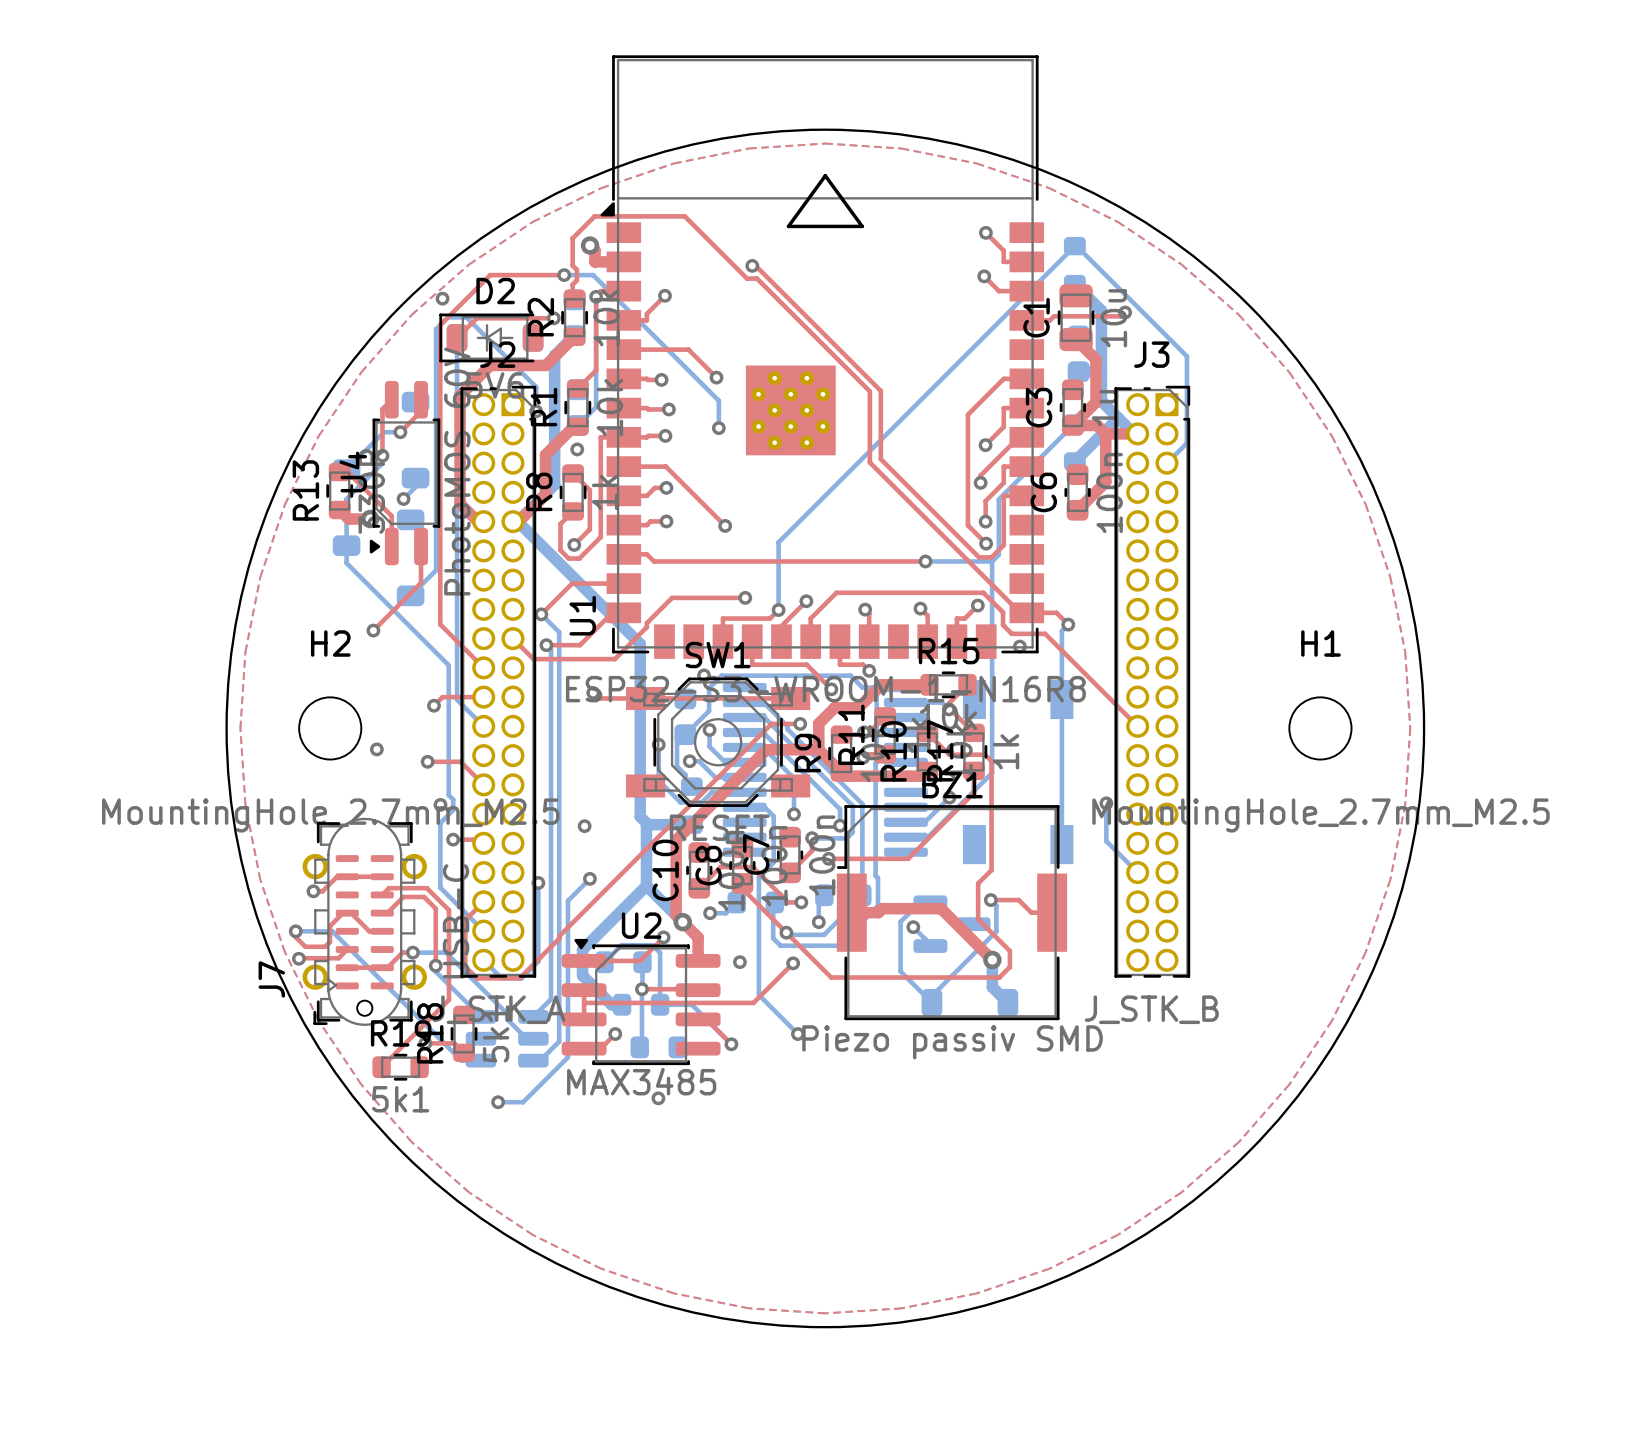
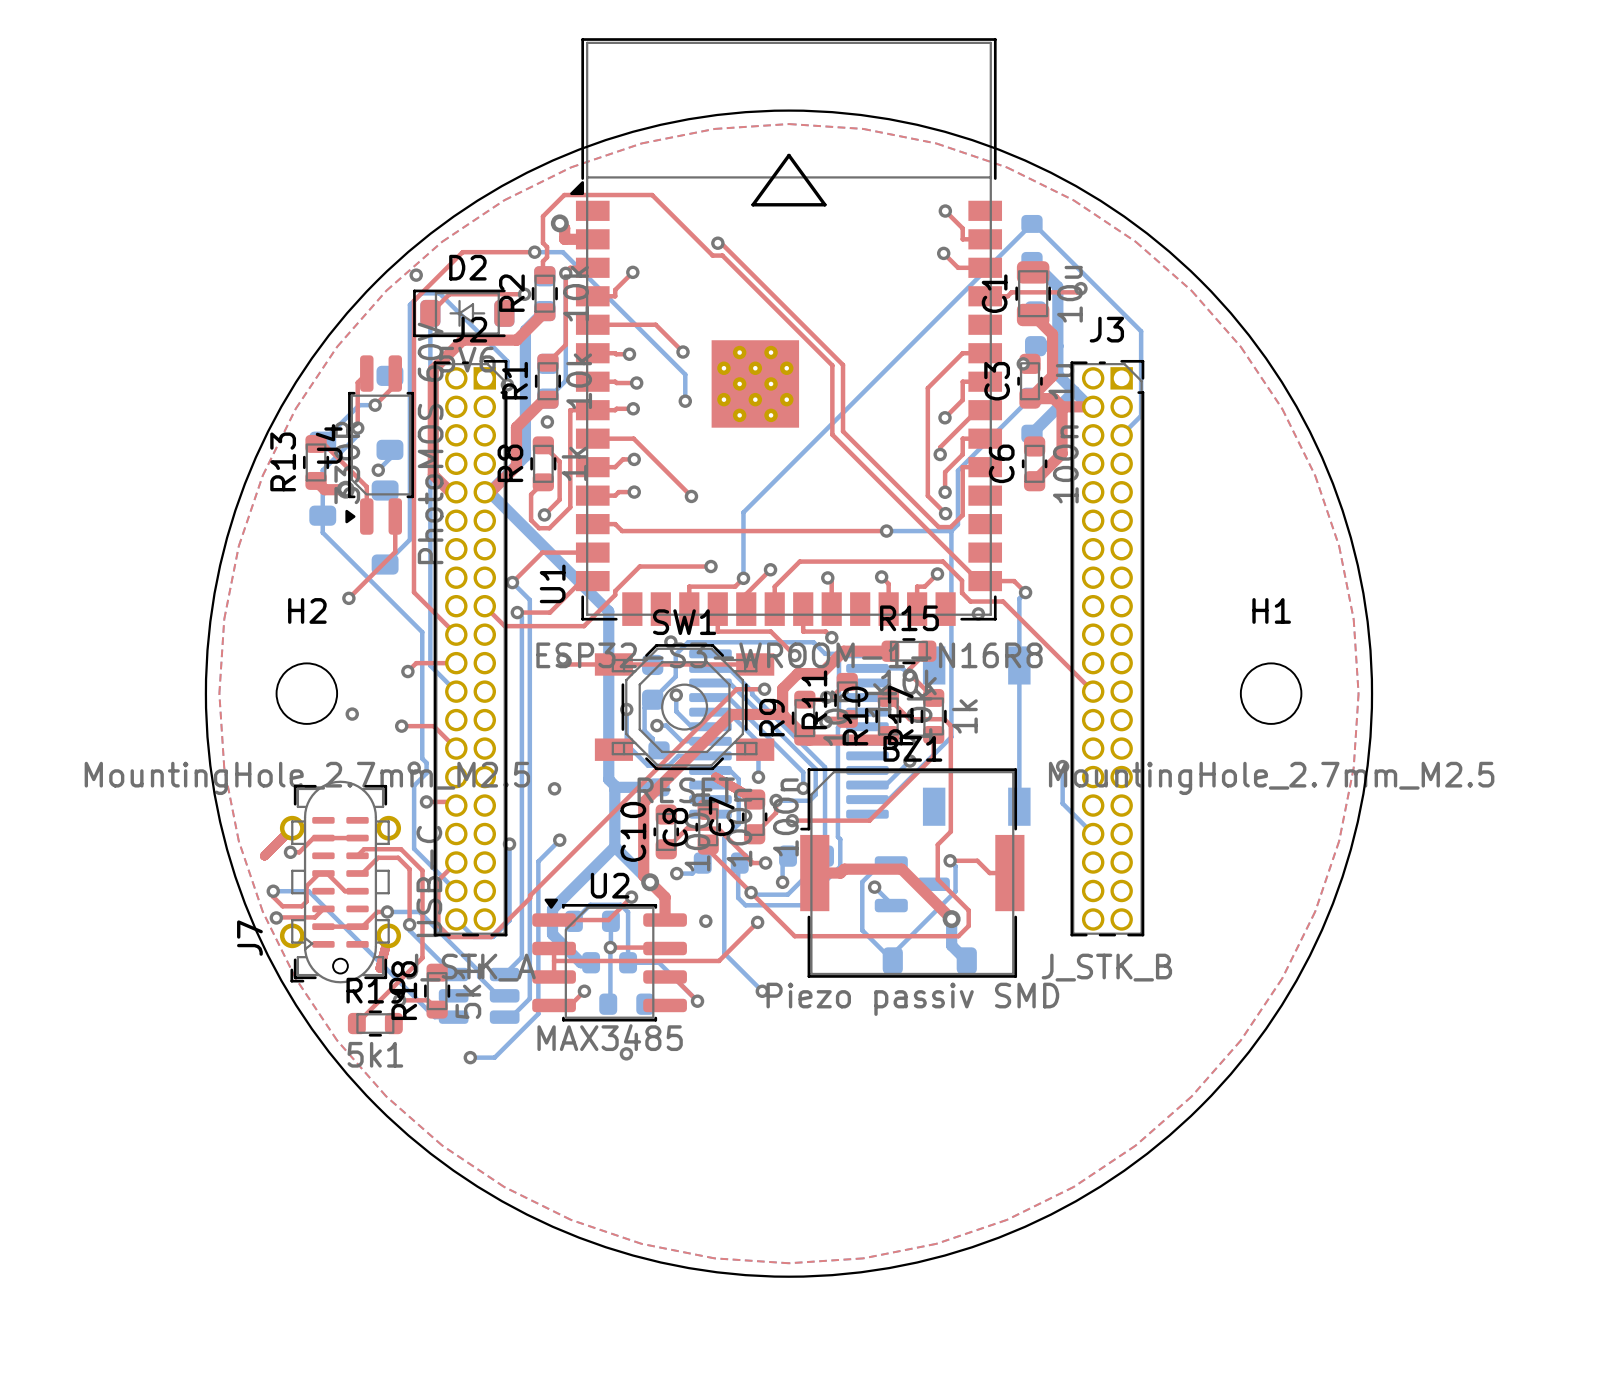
via: none -> (1023, 363)
top track: none -> (715, 777) (754, 799)
top track: none -> (292, 828) (264, 855)
top track: none -> (388, 935) (379, 968)

